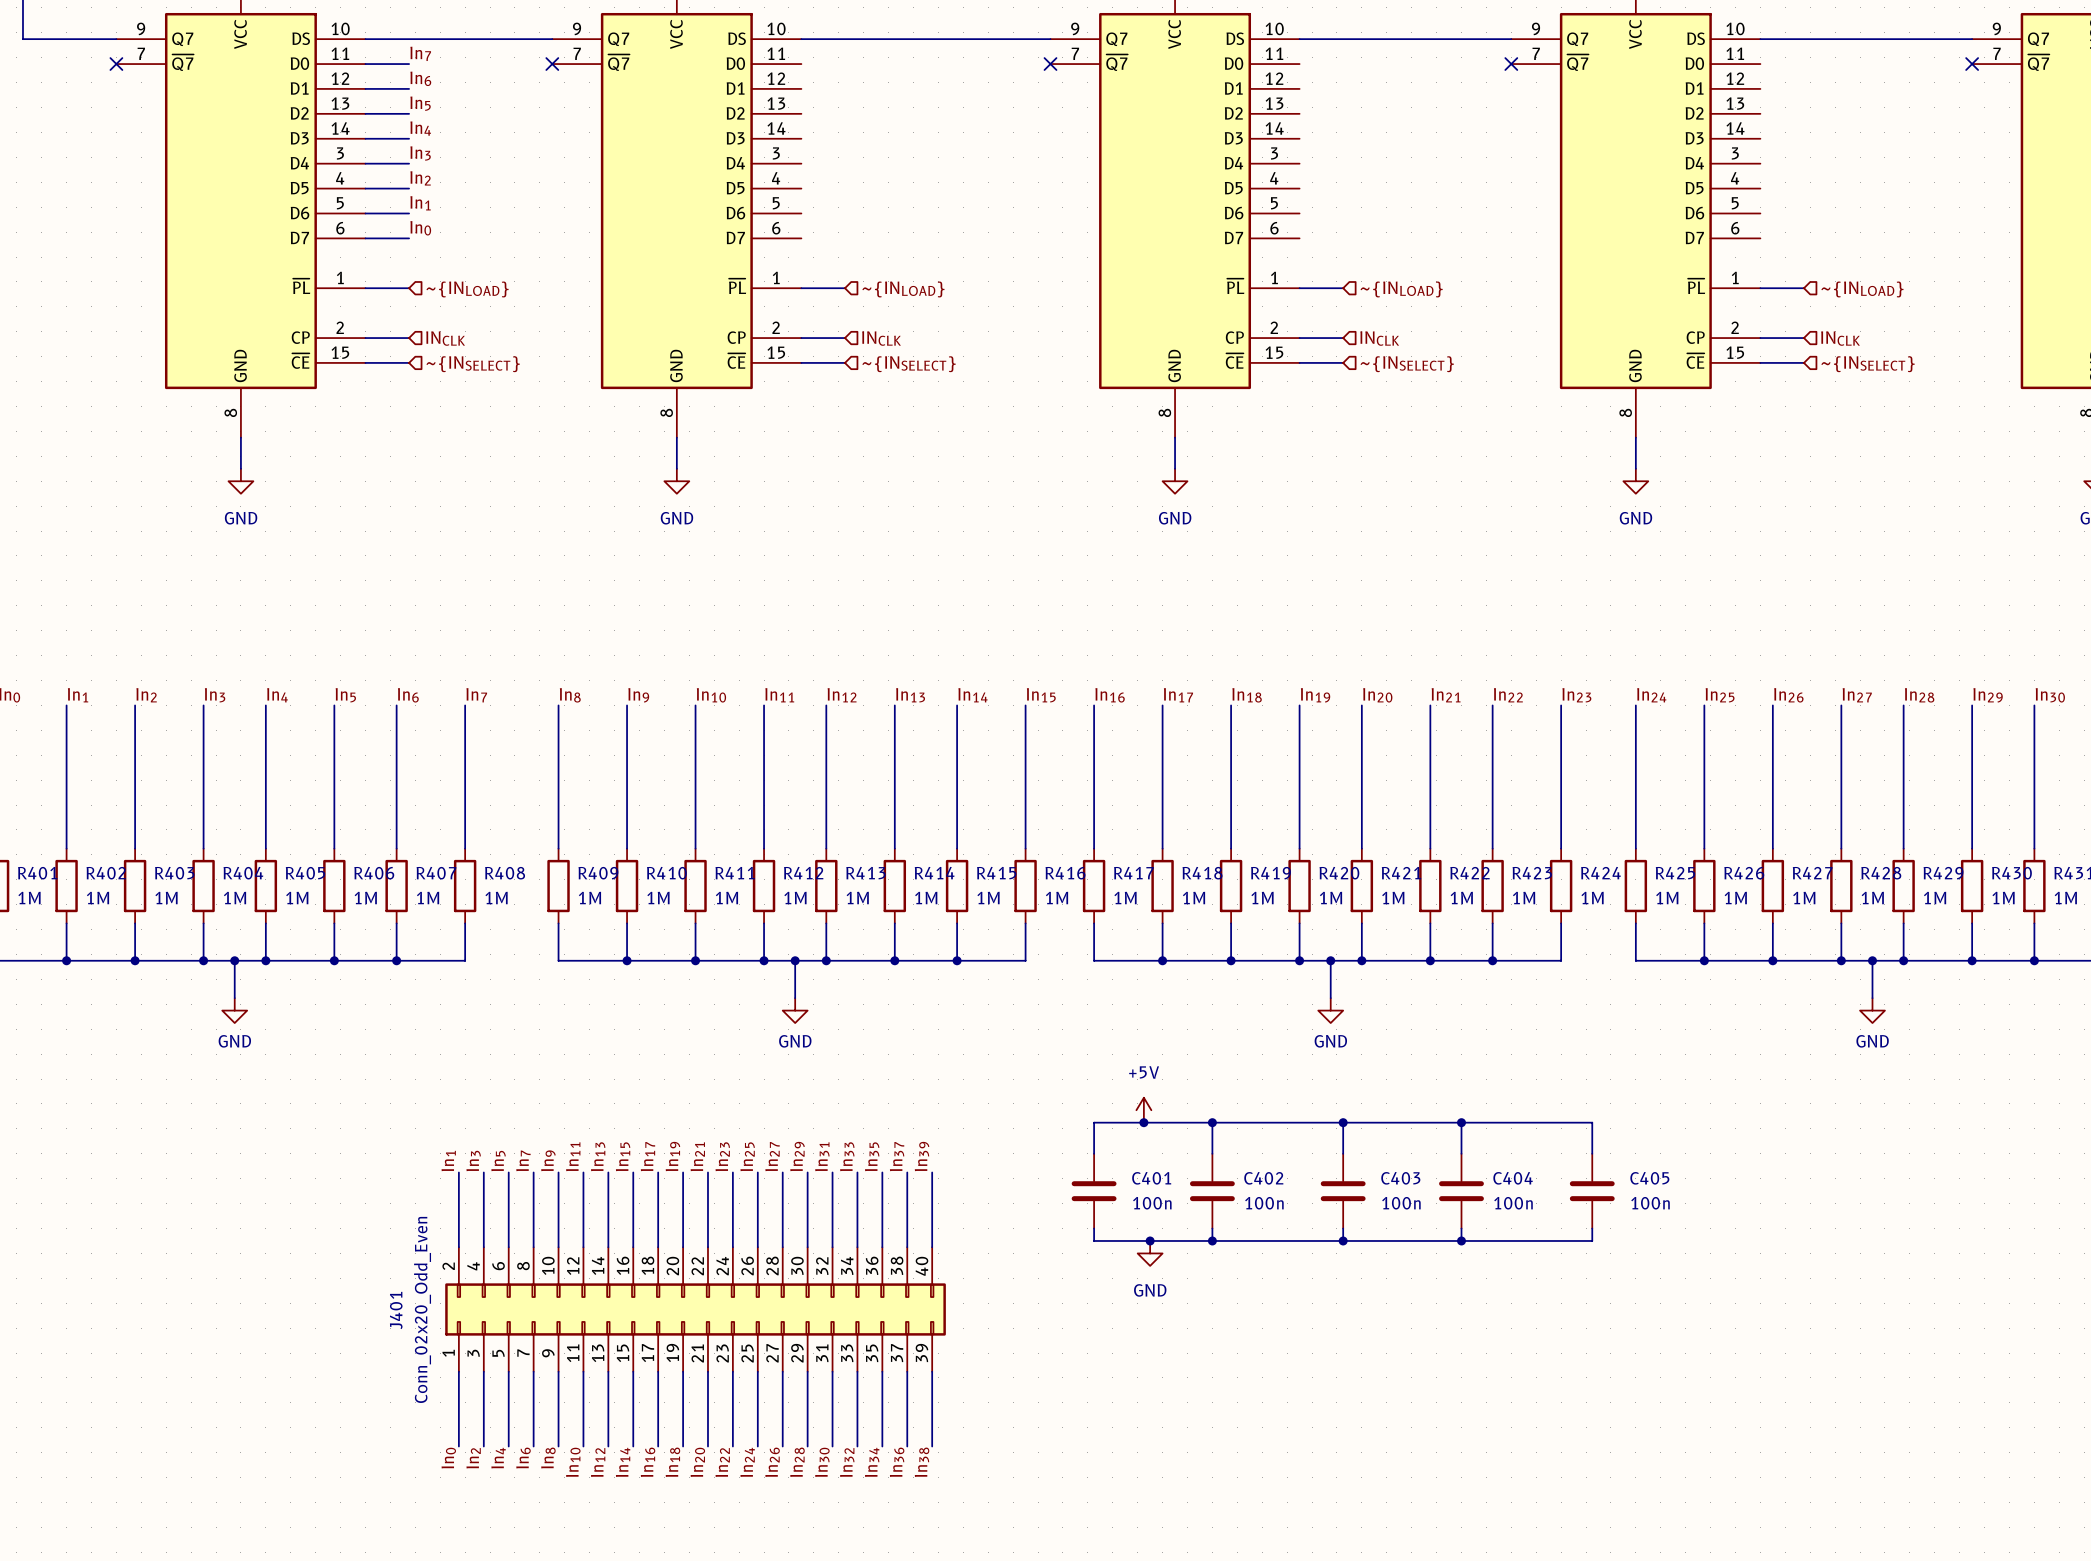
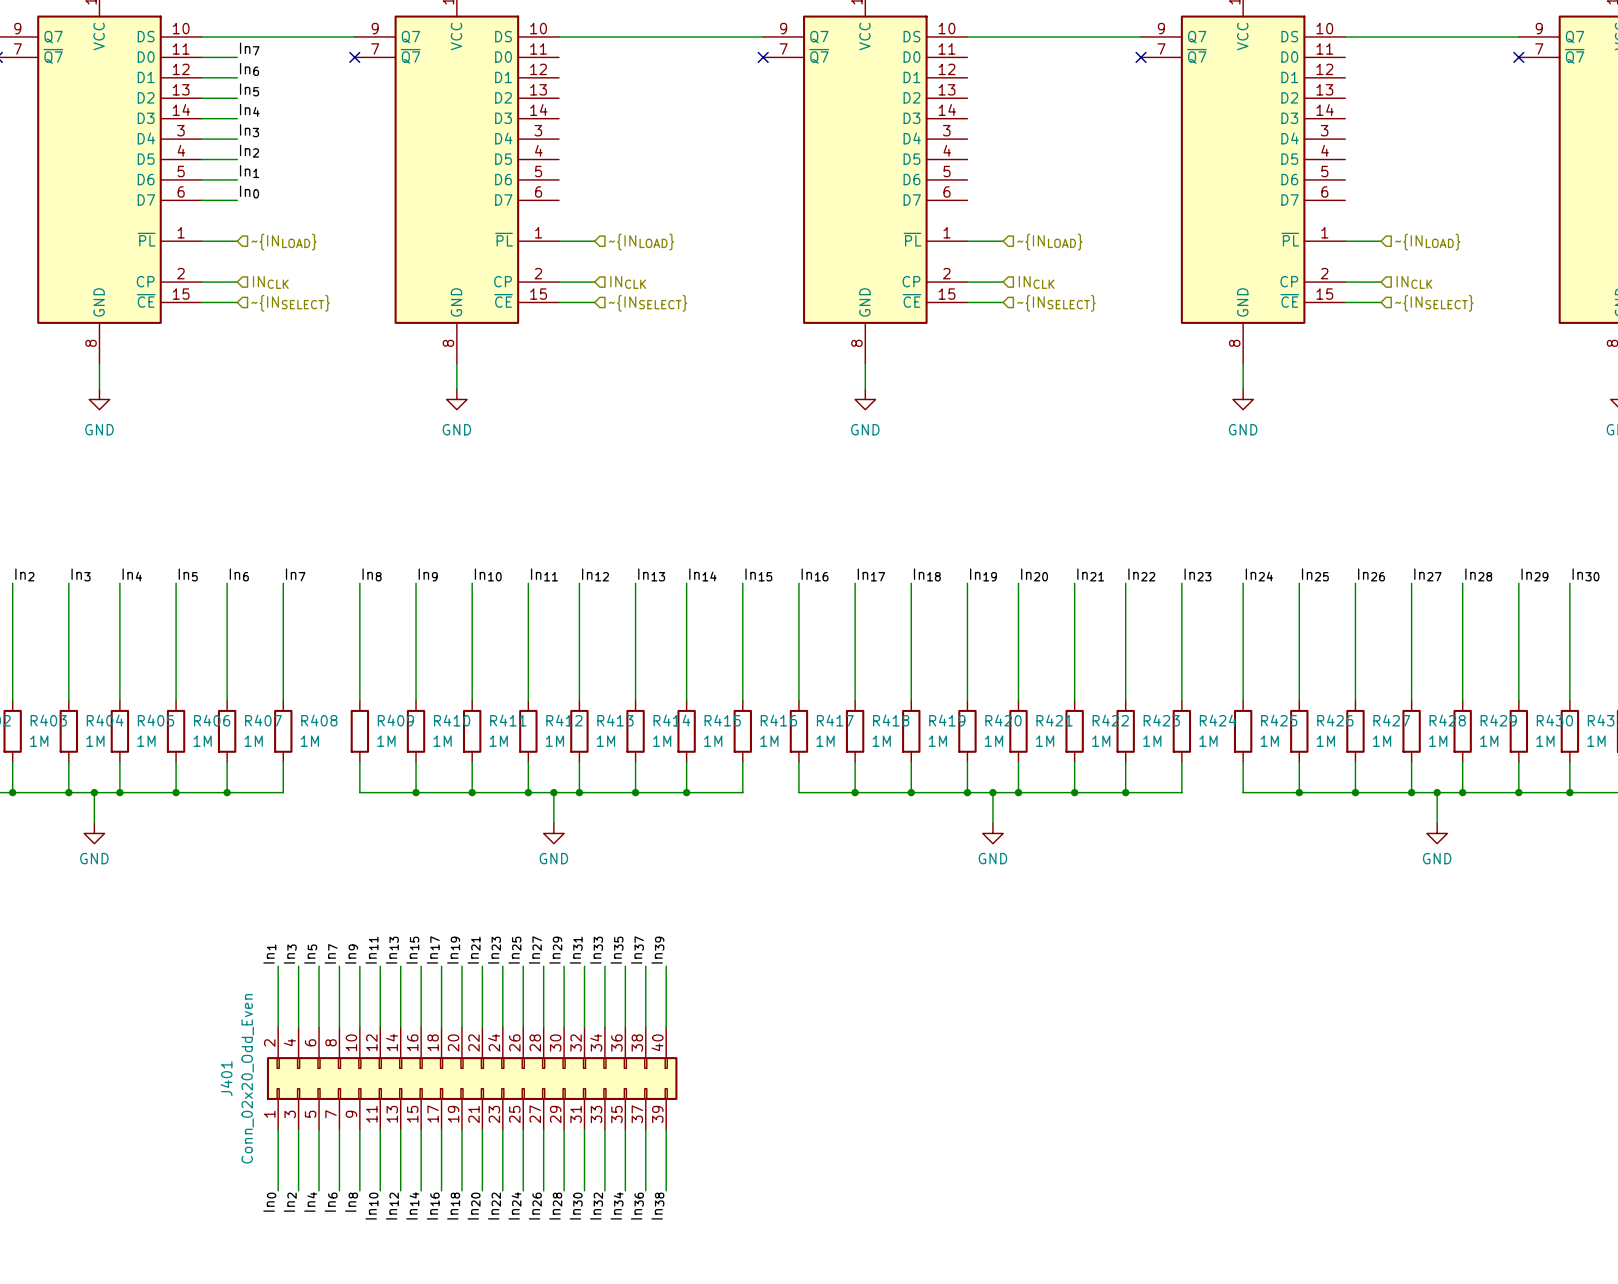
power symbol: +5V (1143, 1110) -> none
junction: (1143, 1122) -> none
wire: (1212, 1122) (1212, 1153) -> none
junction: (1212, 1122) -> none
wire: (1343, 1122) (1343, 1153) -> none
junction: (1343, 1122) -> none
wire: (1461, 1122) (1461, 1153) -> none
junction: (1461, 1122) -> none
wire: (1094, 1153) (1094, 1122) (1592, 1122) (1592, 1153) -> none
C401: 100n (1094, 1191) -> none
C402: 100n (1212, 1191) -> none
C403: 100n (1343, 1191) -> none
C404: 100n (1461, 1191) -> none
C405: 100n (1592, 1191) -> none
wire: (1094, 1228) (1094, 1240) (1592, 1240) (1592, 1228) -> none
wire: (1212, 1228) (1212, 1240) -> none
wire: (1343, 1228) (1343, 1240) -> none
wire: (1461, 1228) (1461, 1240) -> none
junction: (1150, 1240) -> none
junction: (1212, 1240) -> none
junction: (1343, 1240) -> none
junction: (1461, 1240) -> none
power symbol: GND (1150, 1253) -> none

